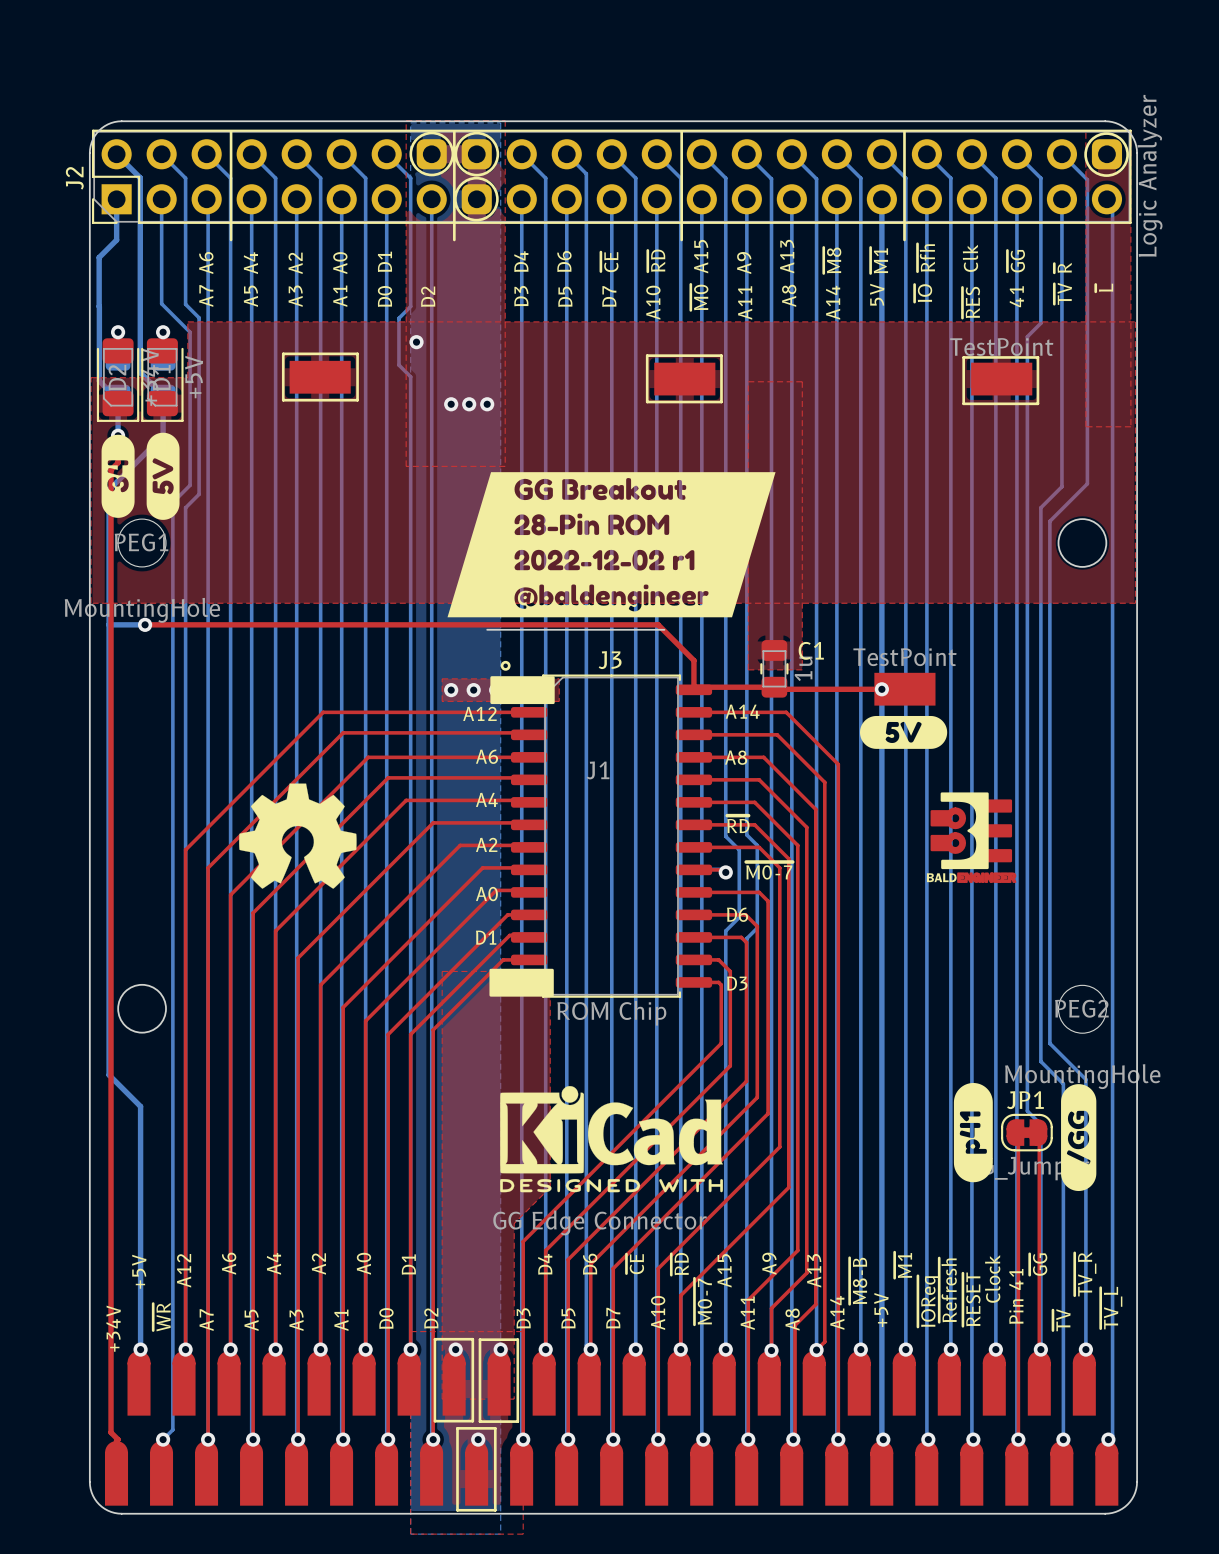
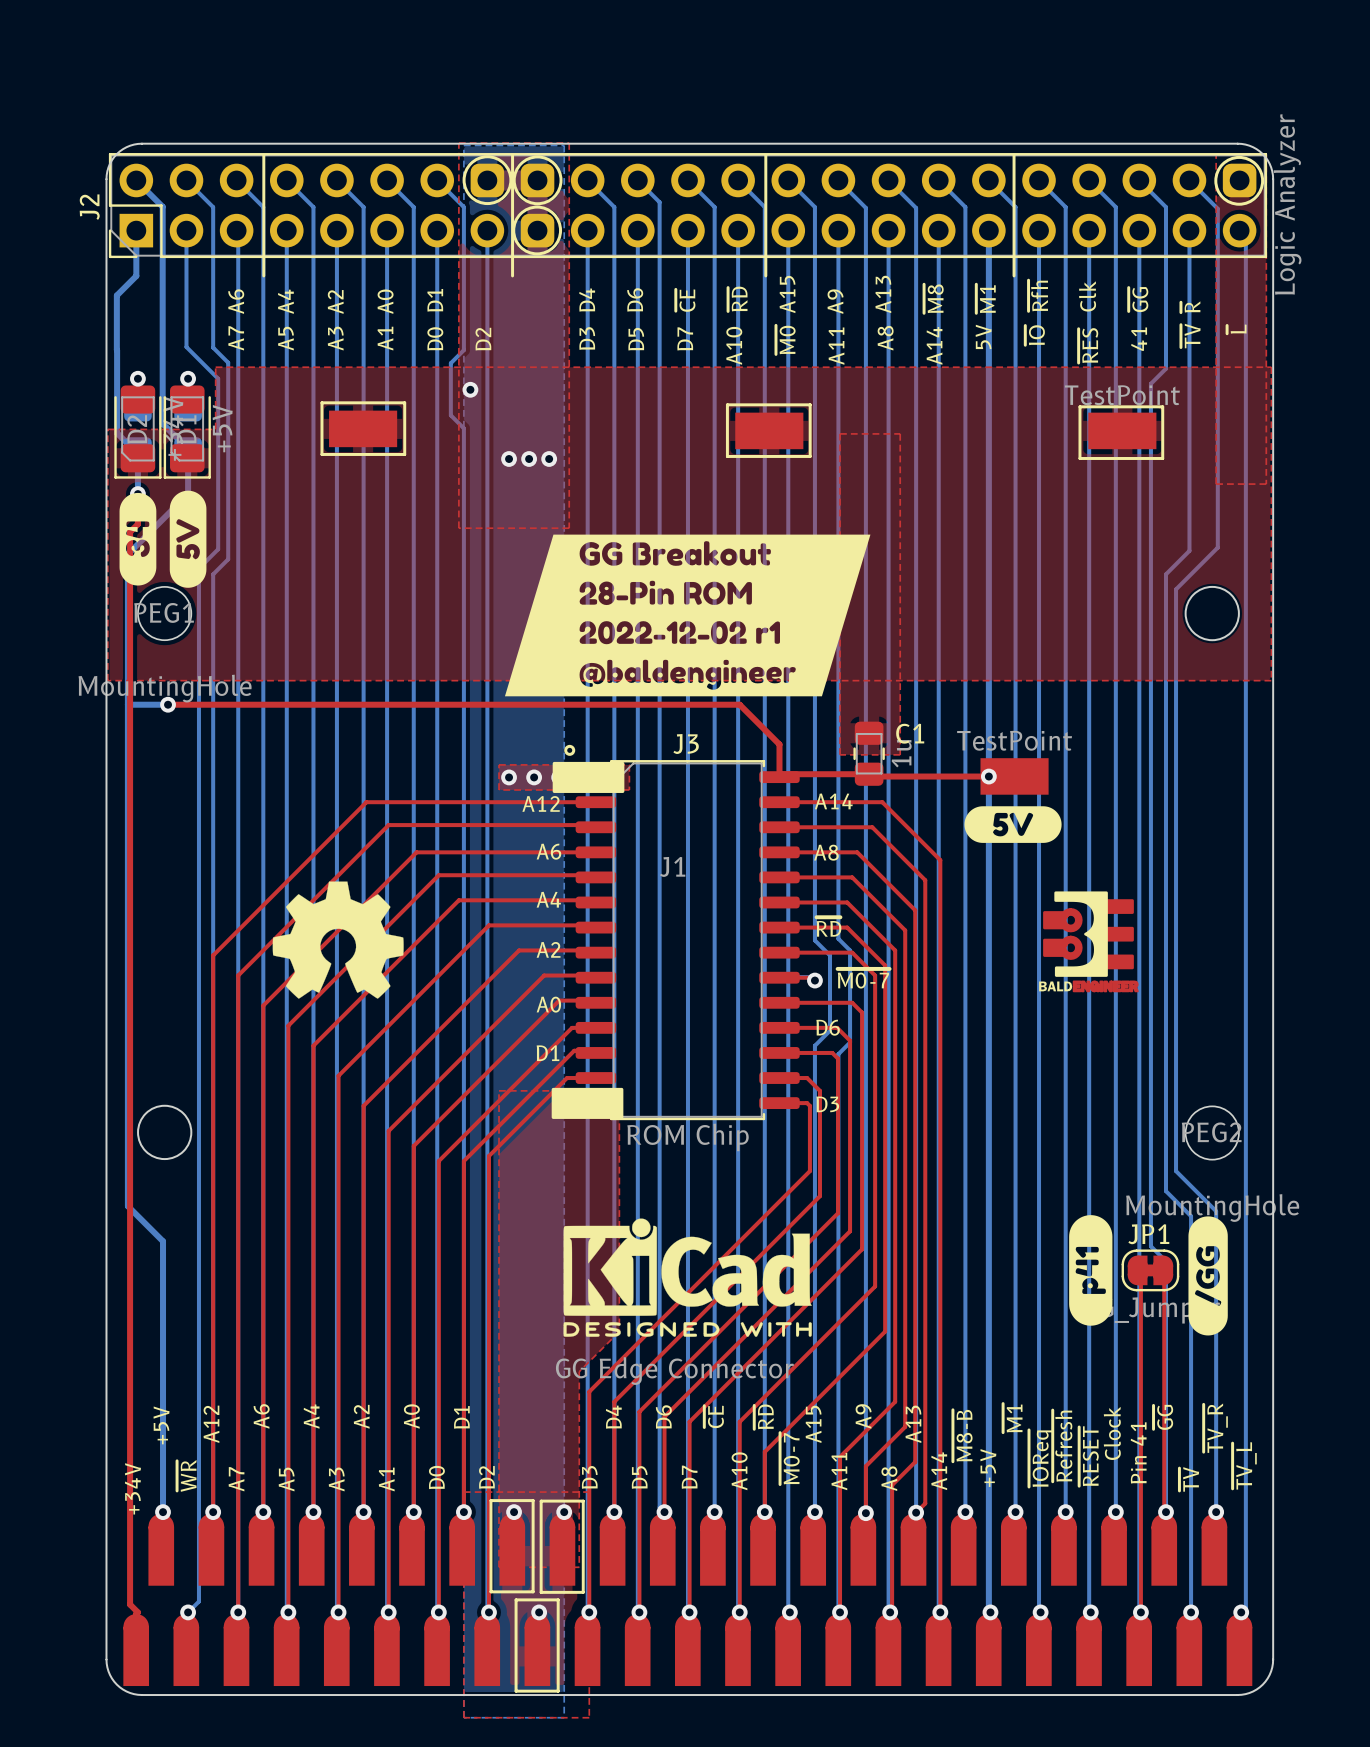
board edge: (487, 629) (664, 629) -> none

